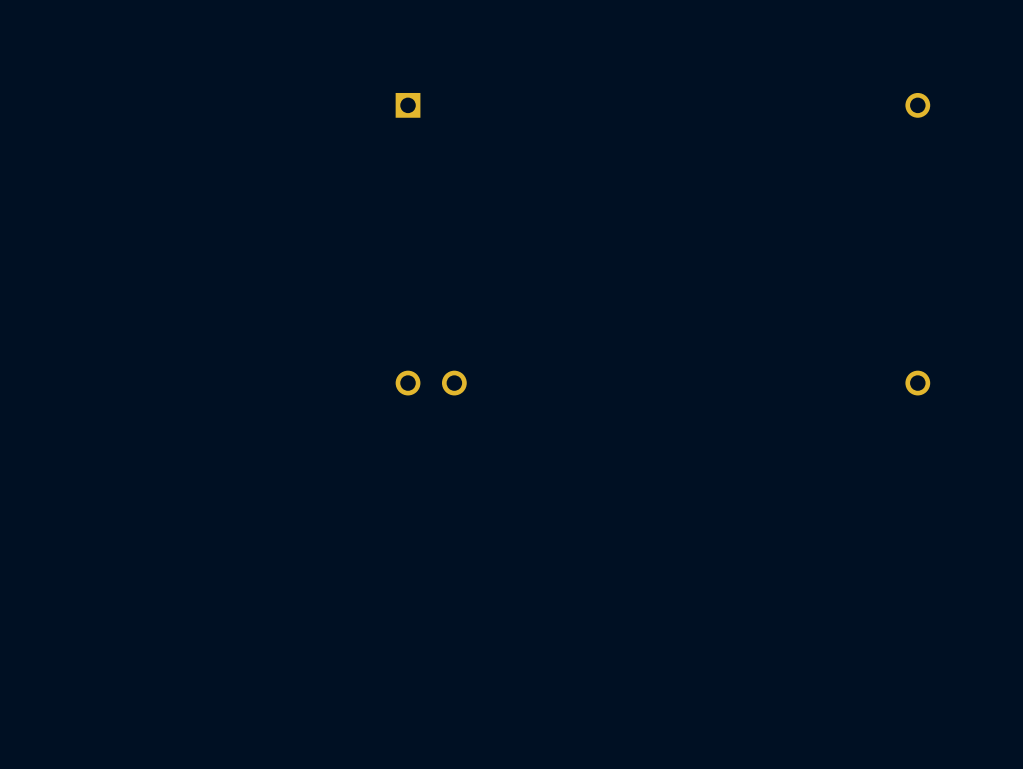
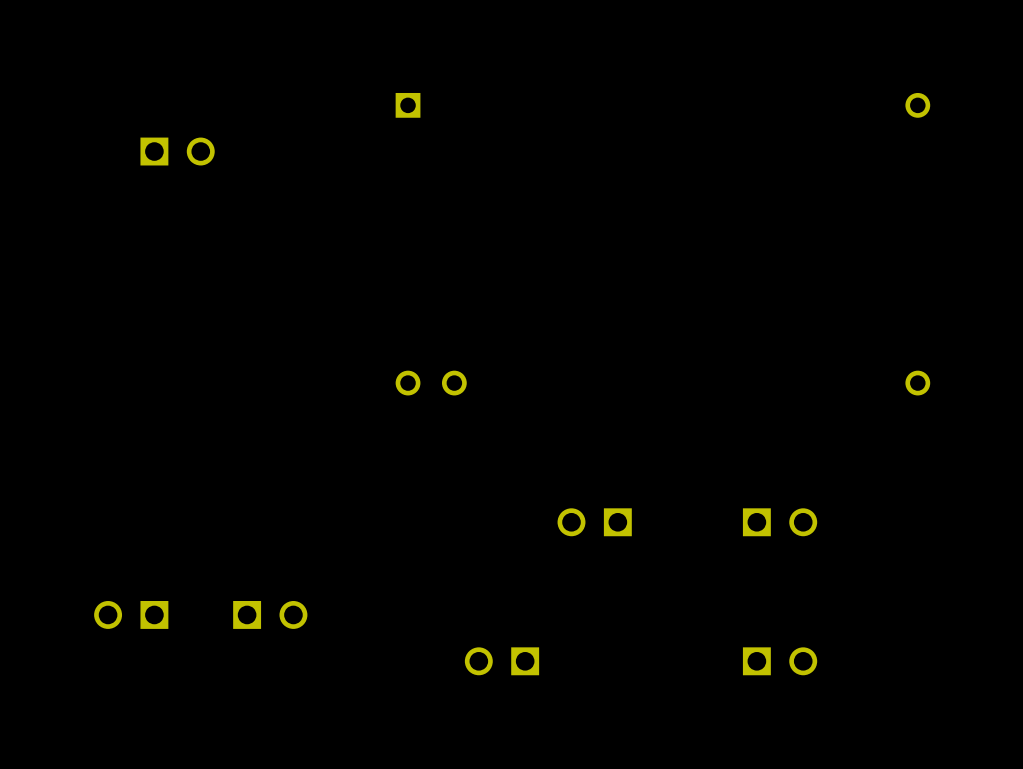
part: none -> (177, 151)
part: none -> (594, 522)
part: none -> (780, 522)
part: none -> (131, 614)
part: none -> (270, 614)
part: none -> (501, 661)
part: none -> (780, 661)

